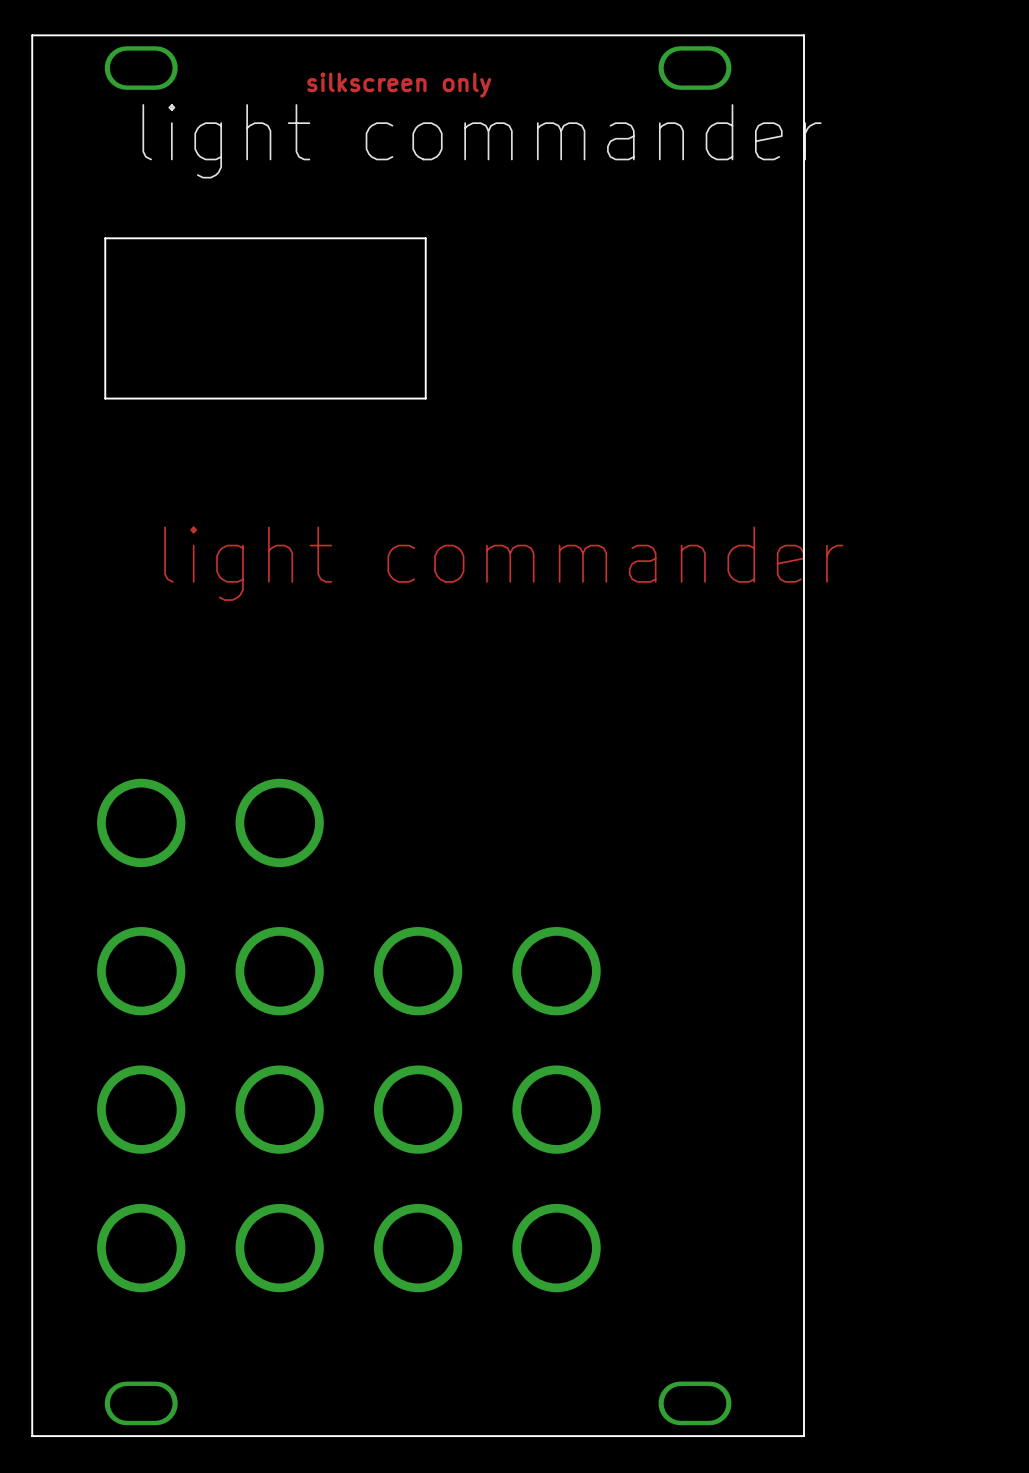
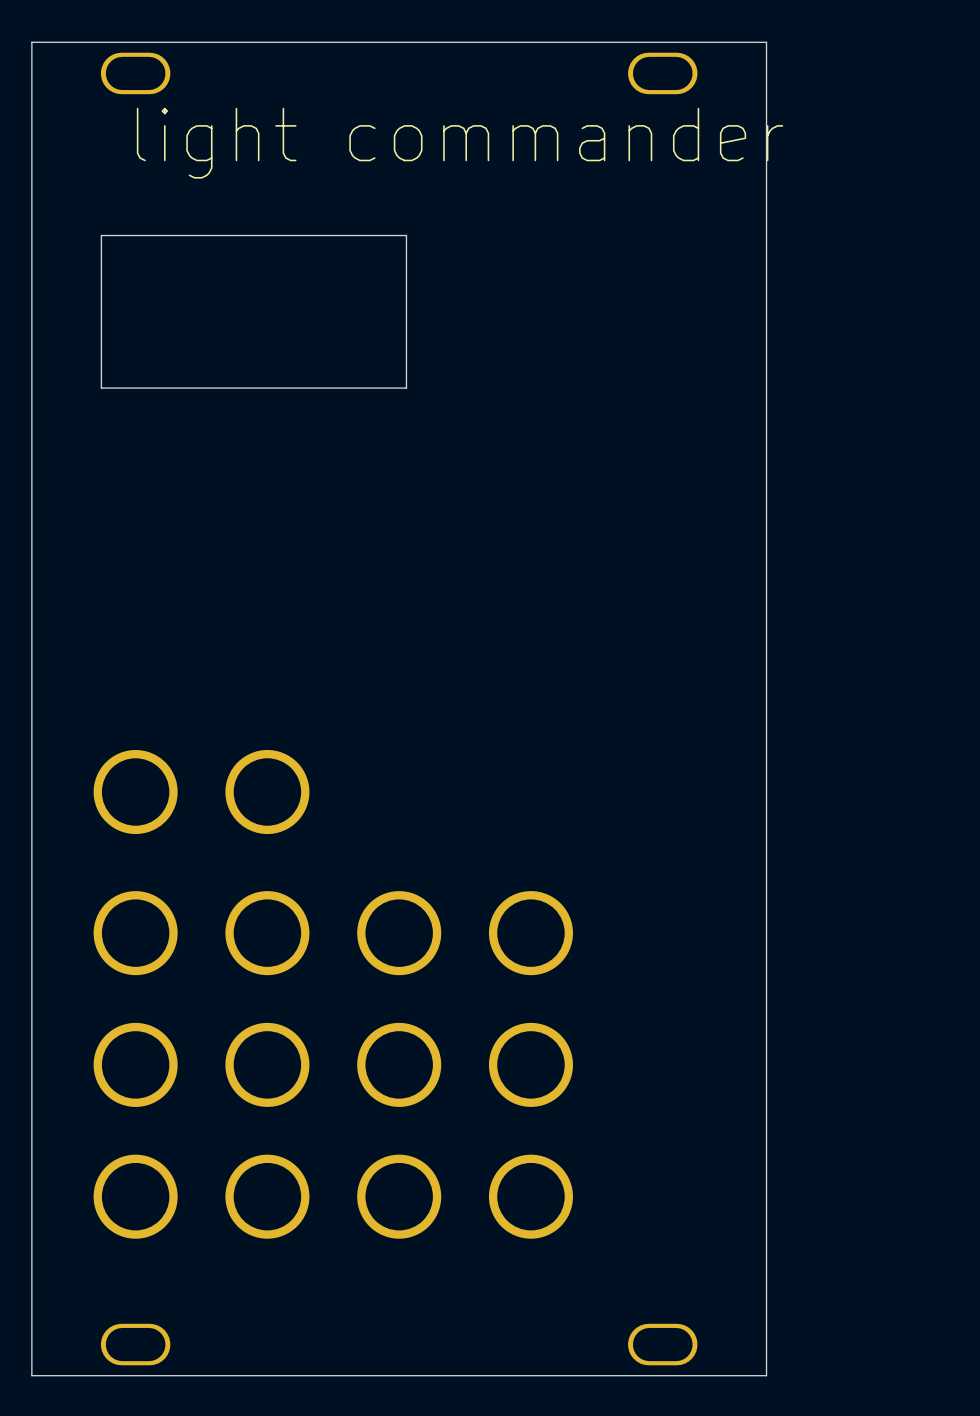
text: silkscreen only (399, 85) -> none
text: light commander (503, 563) -> none

